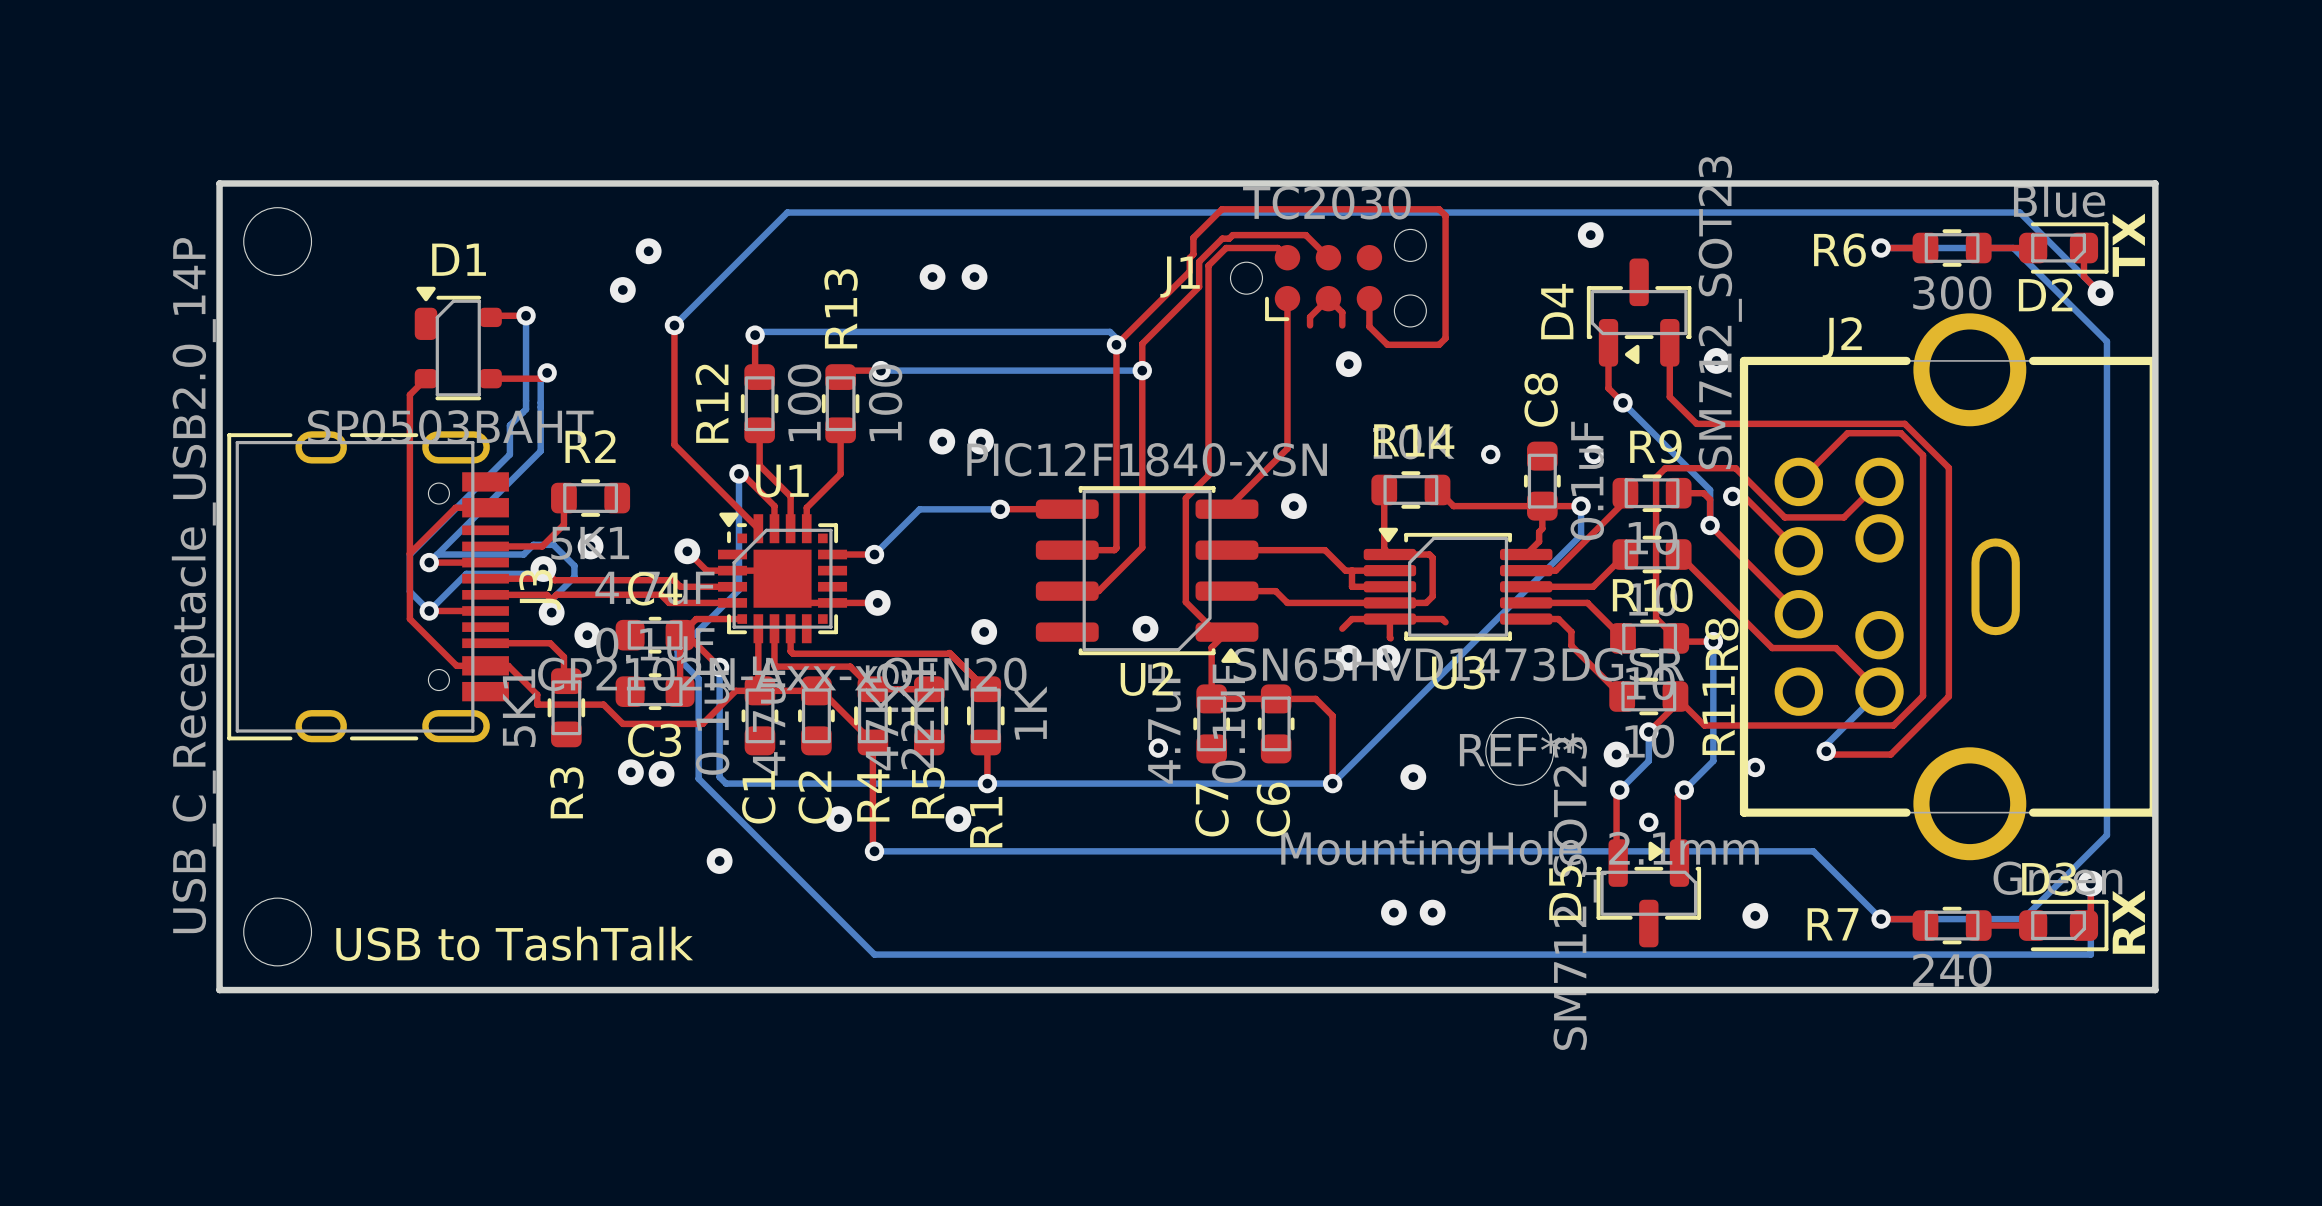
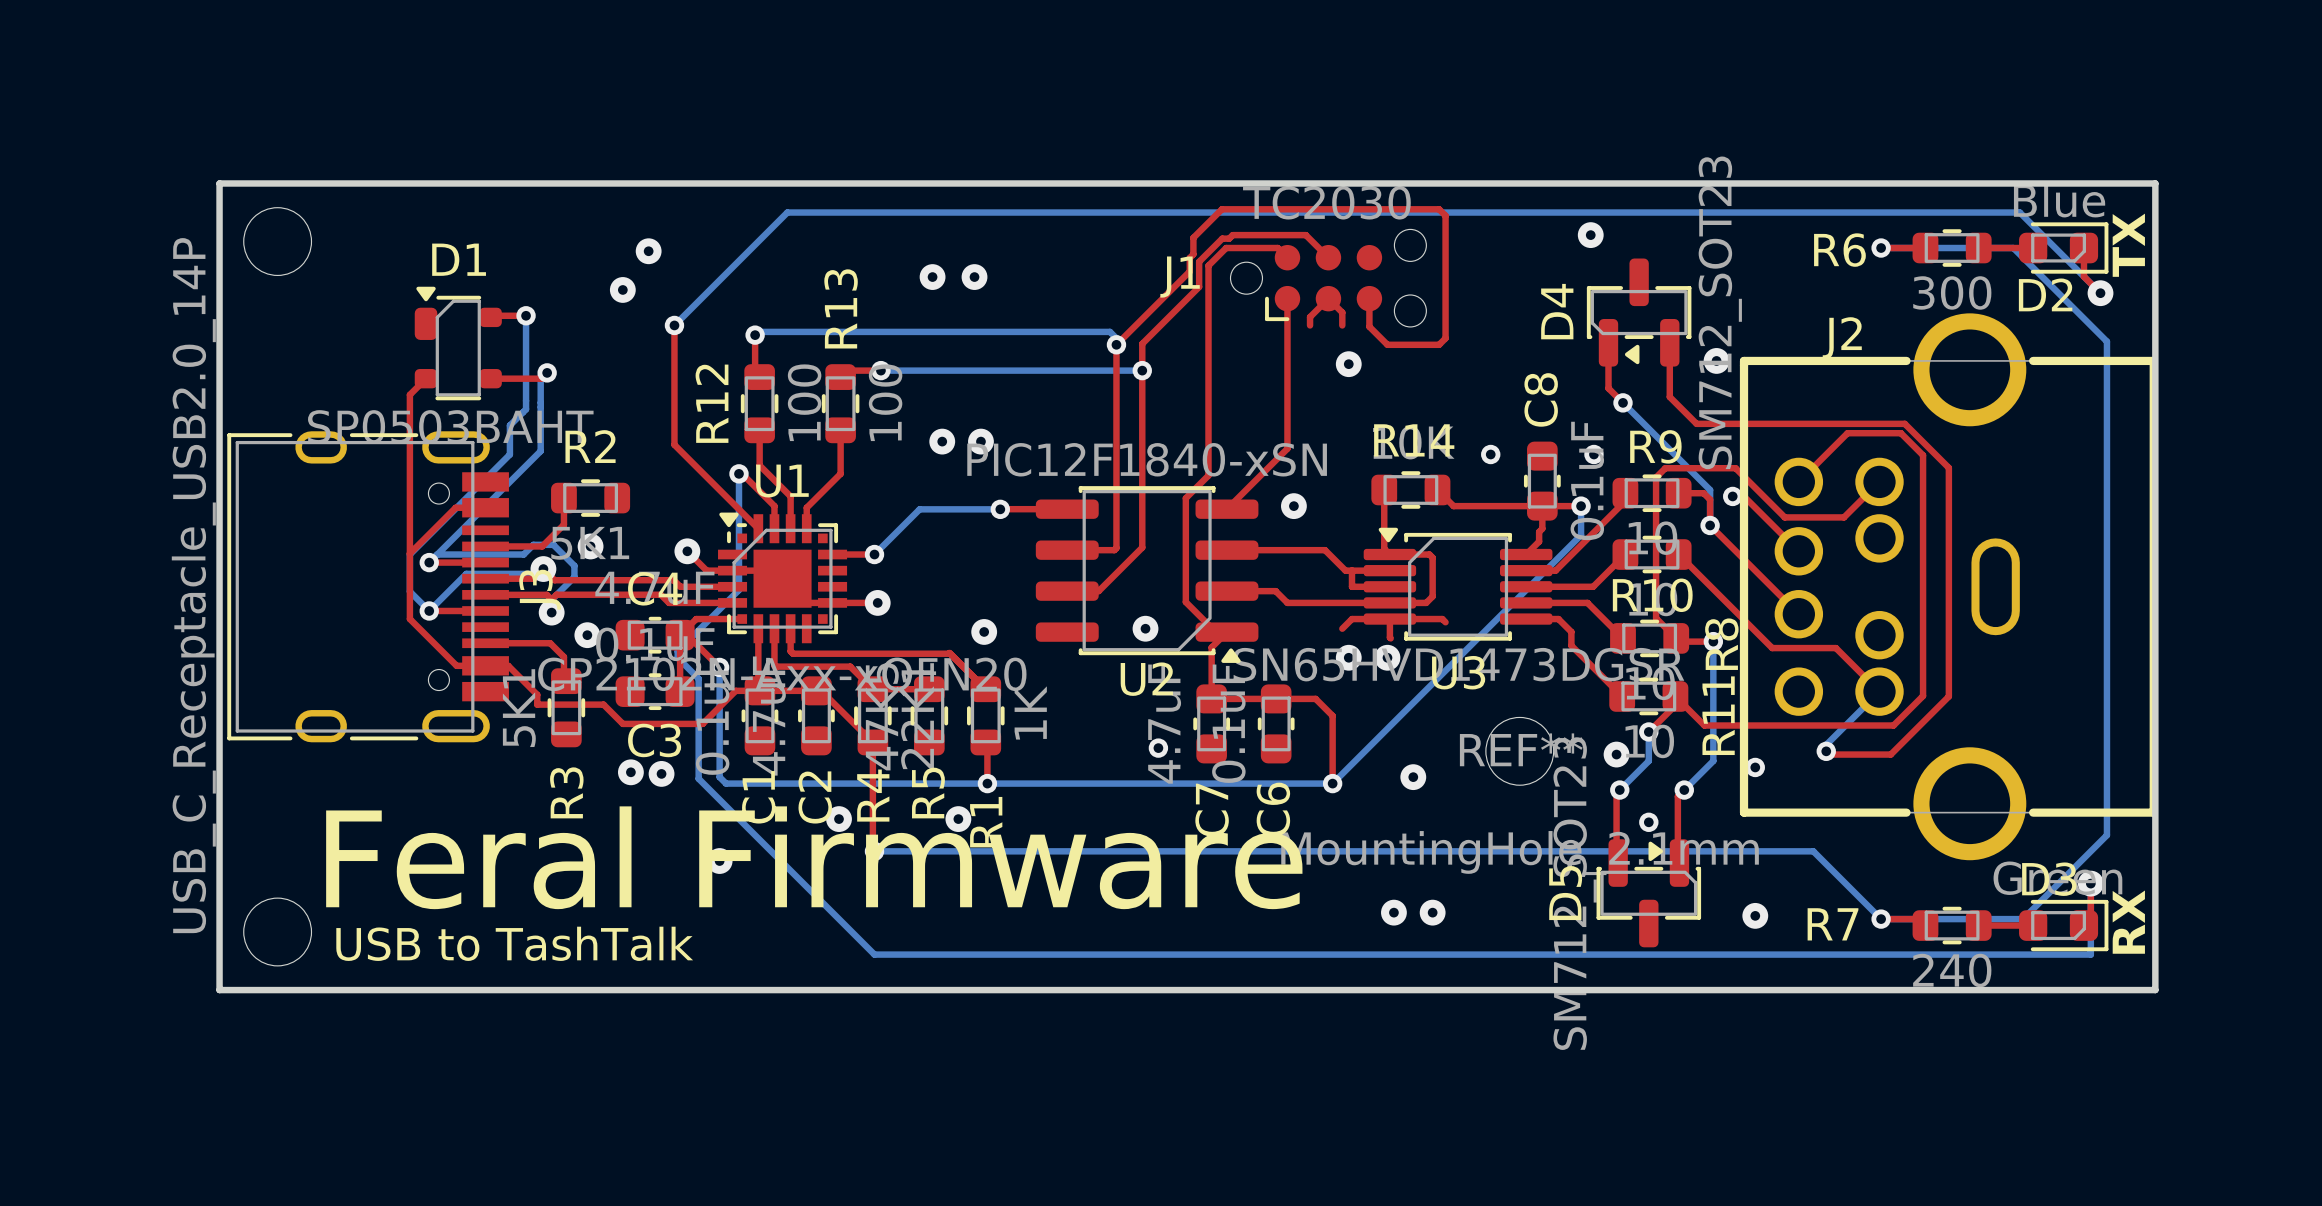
text: none -> Feral Firmware (814, 857)

